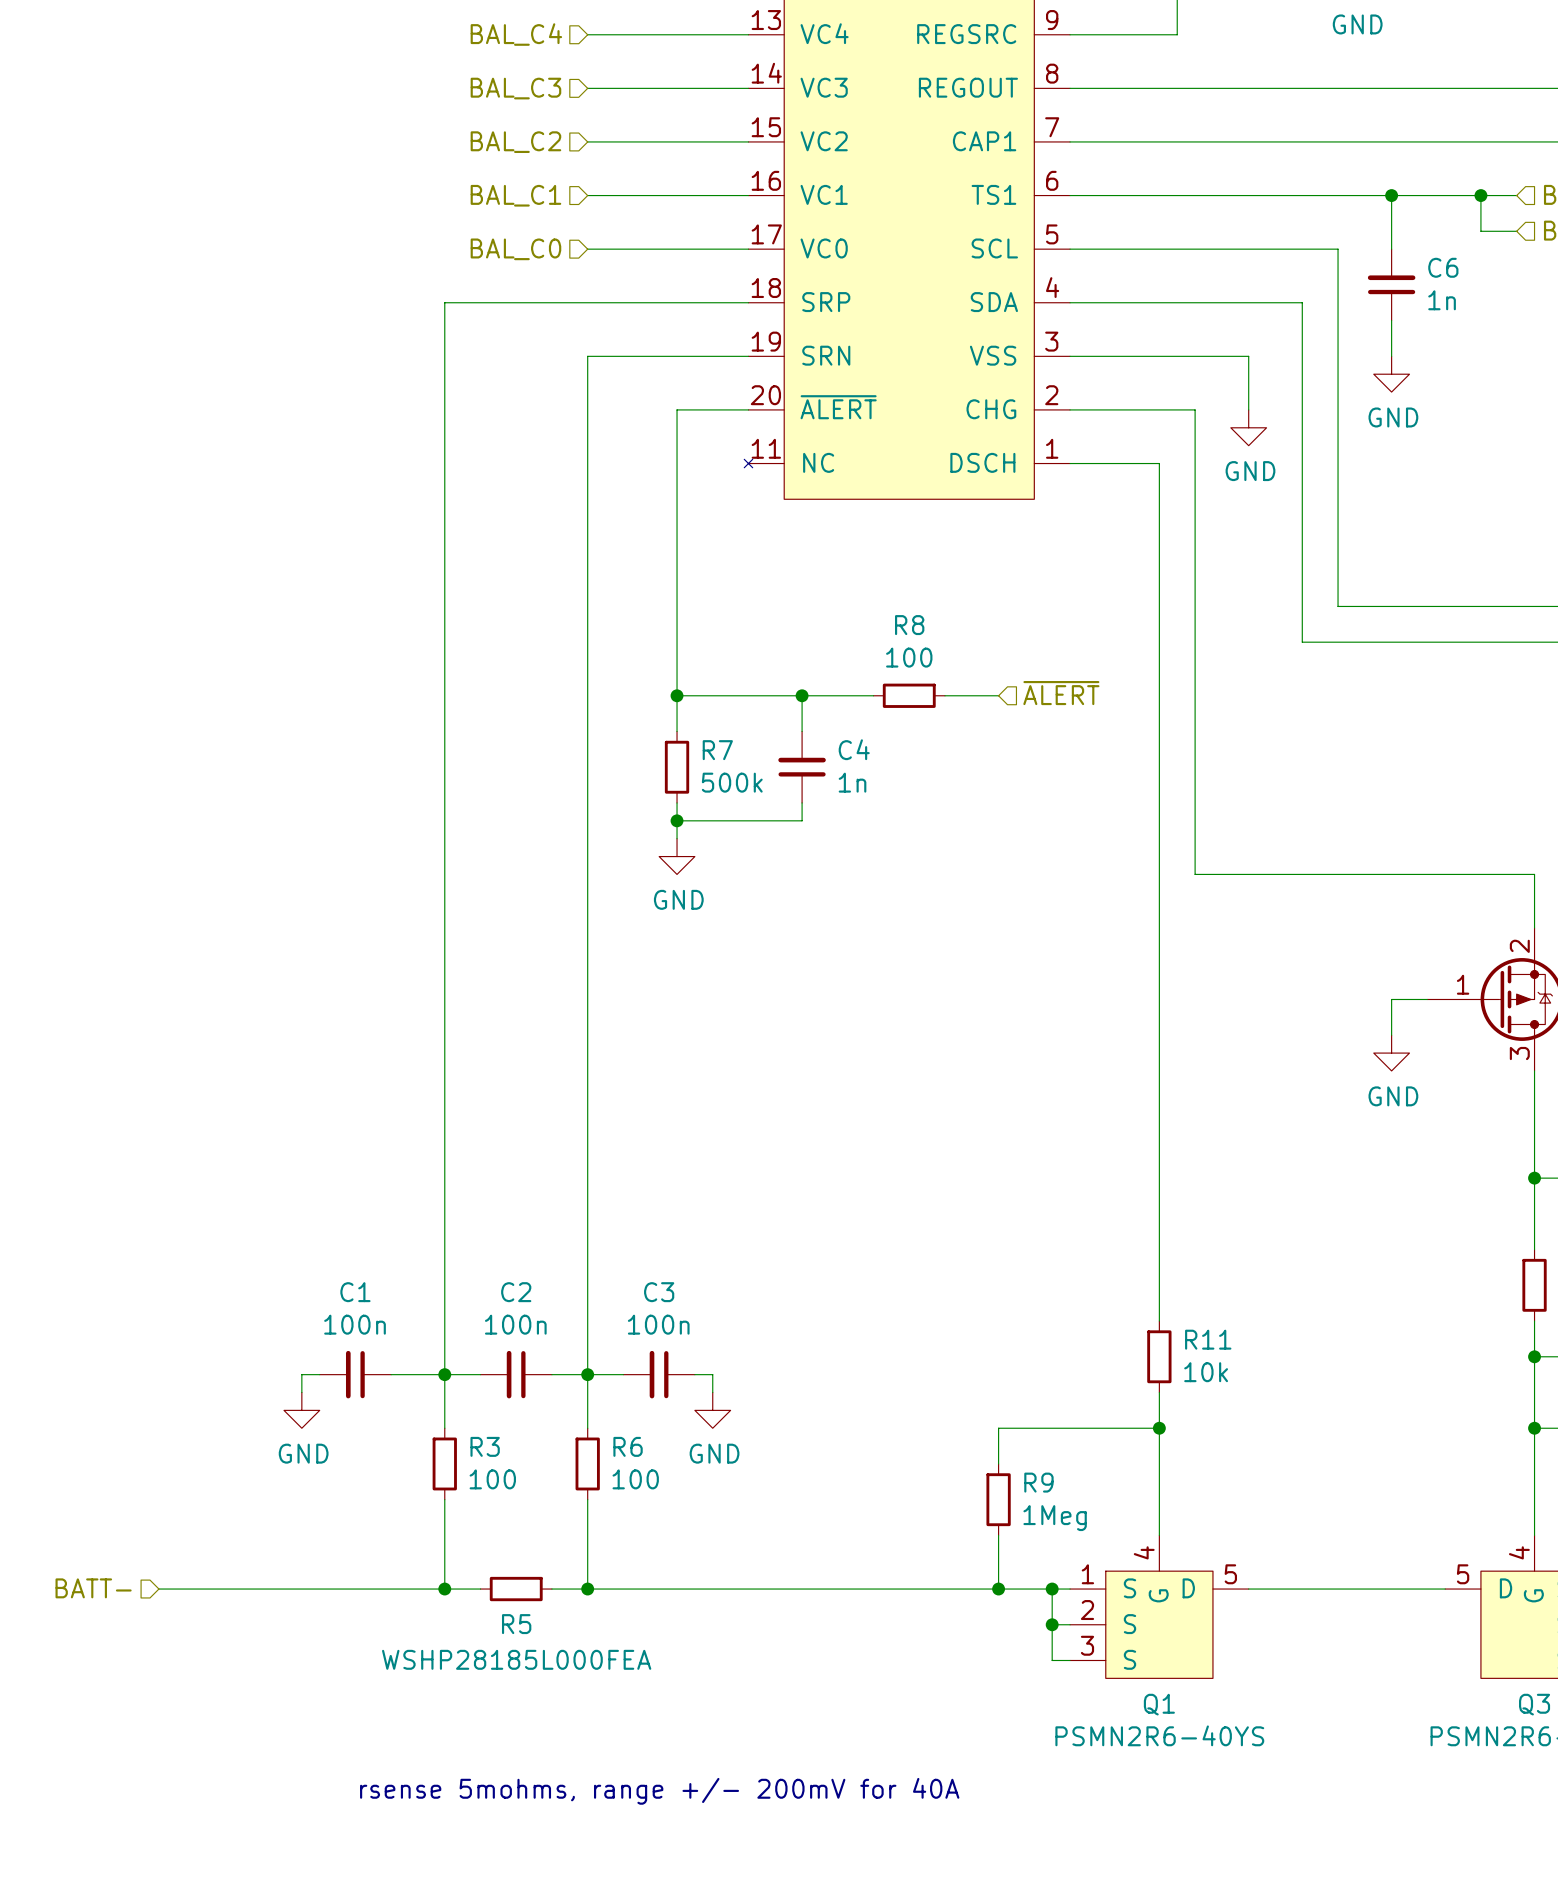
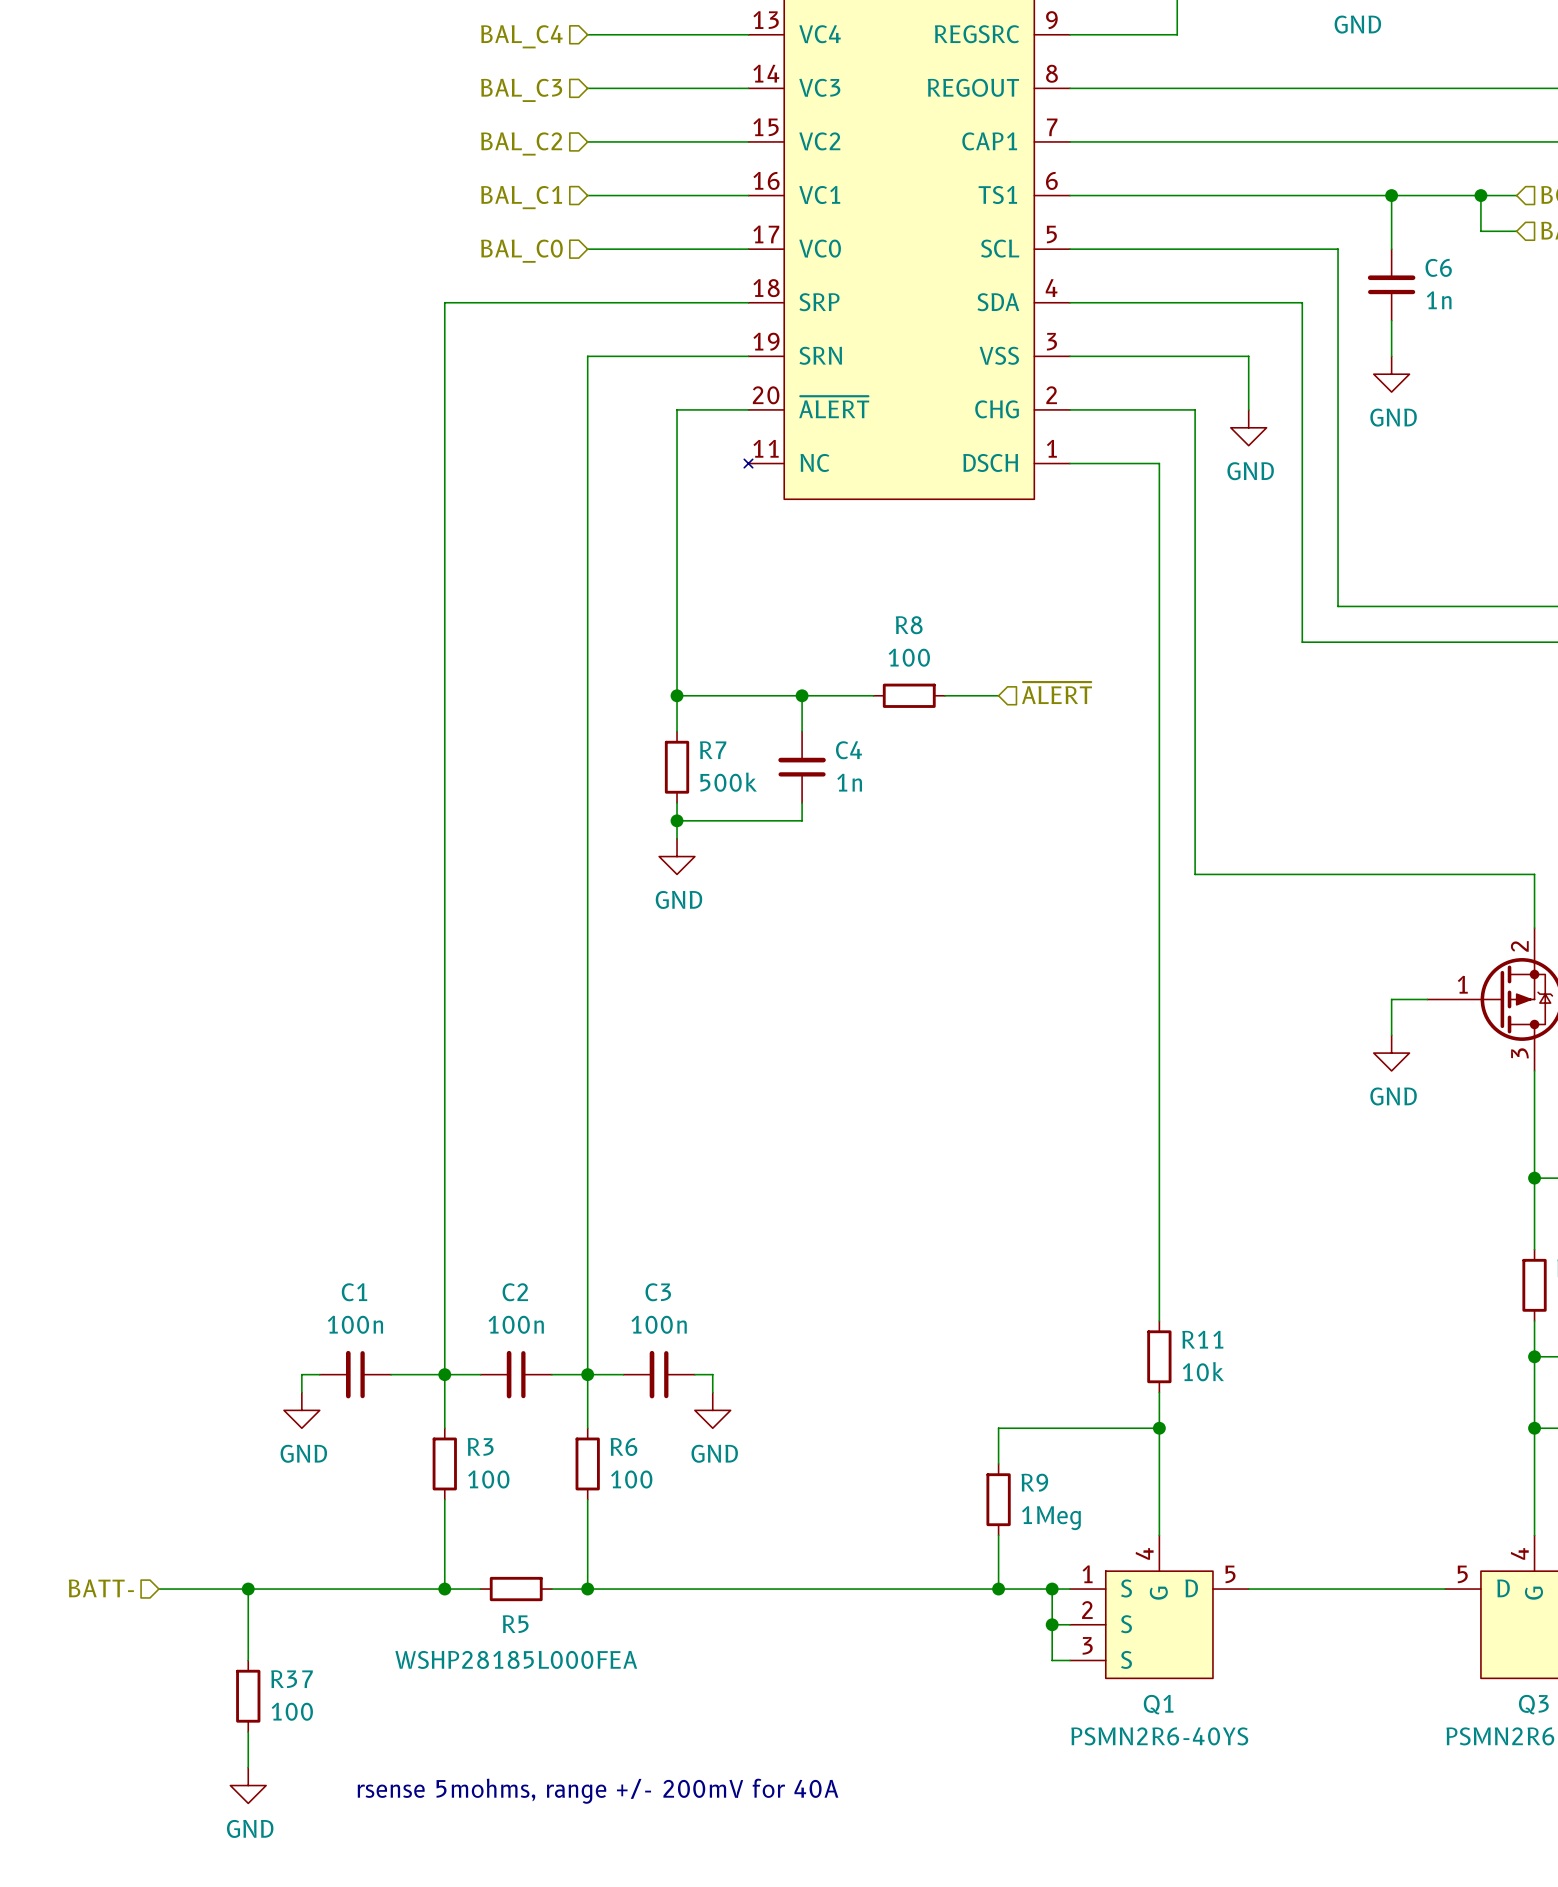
wire: none -> (248, 1589) (248, 1660)
junction: none -> (248, 1589)
R37: none -> 100 (248, 1696)
wire: none -> (248, 1731) (248, 1767)
power symbol: none -> GND (248, 1785)

